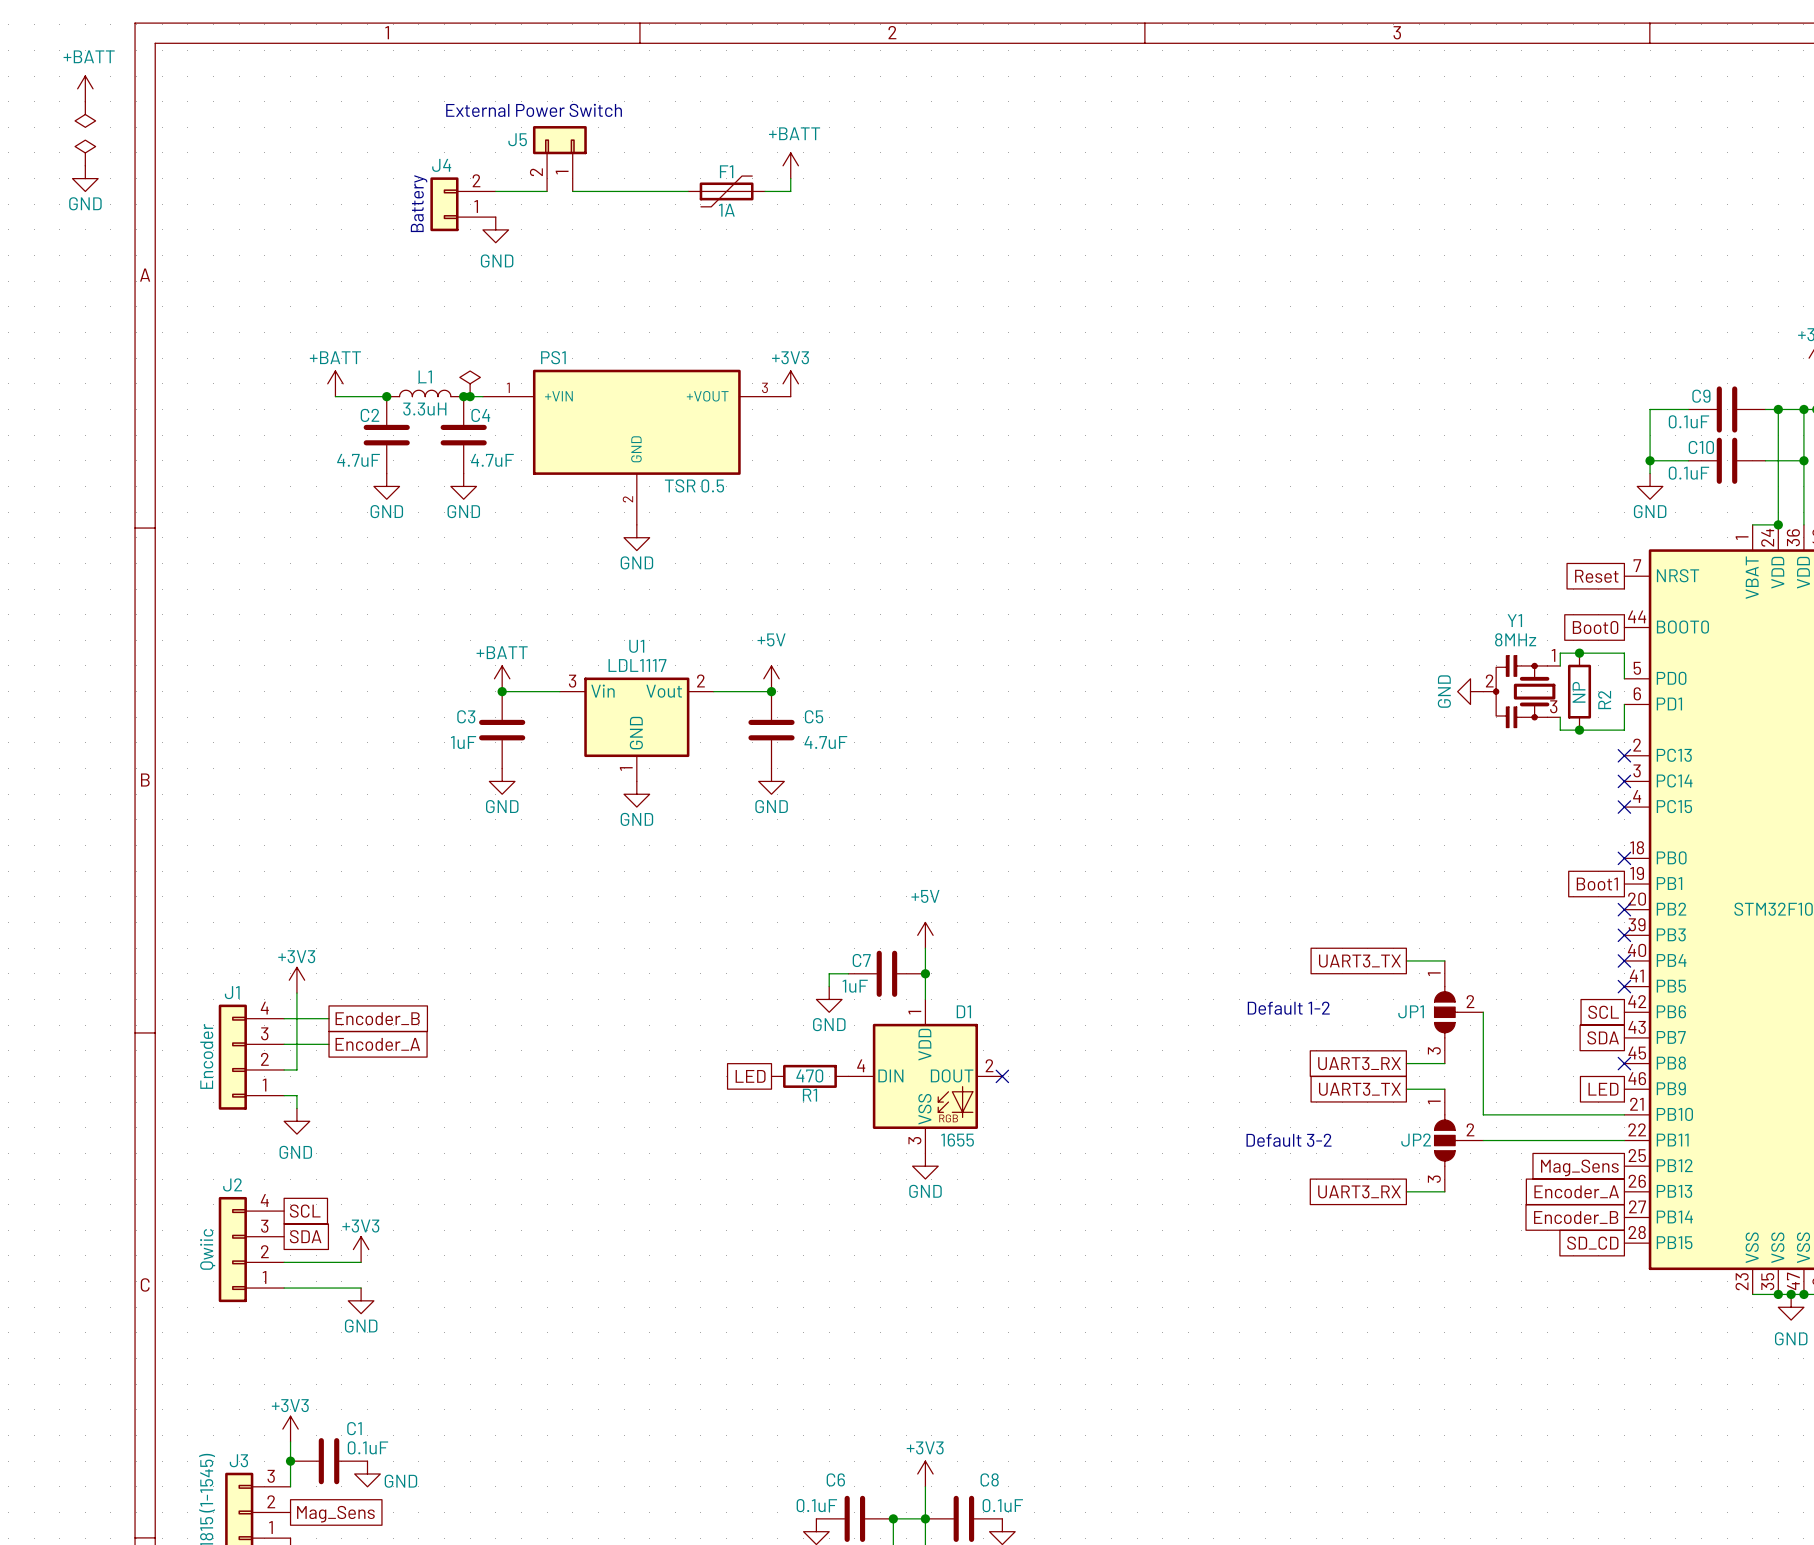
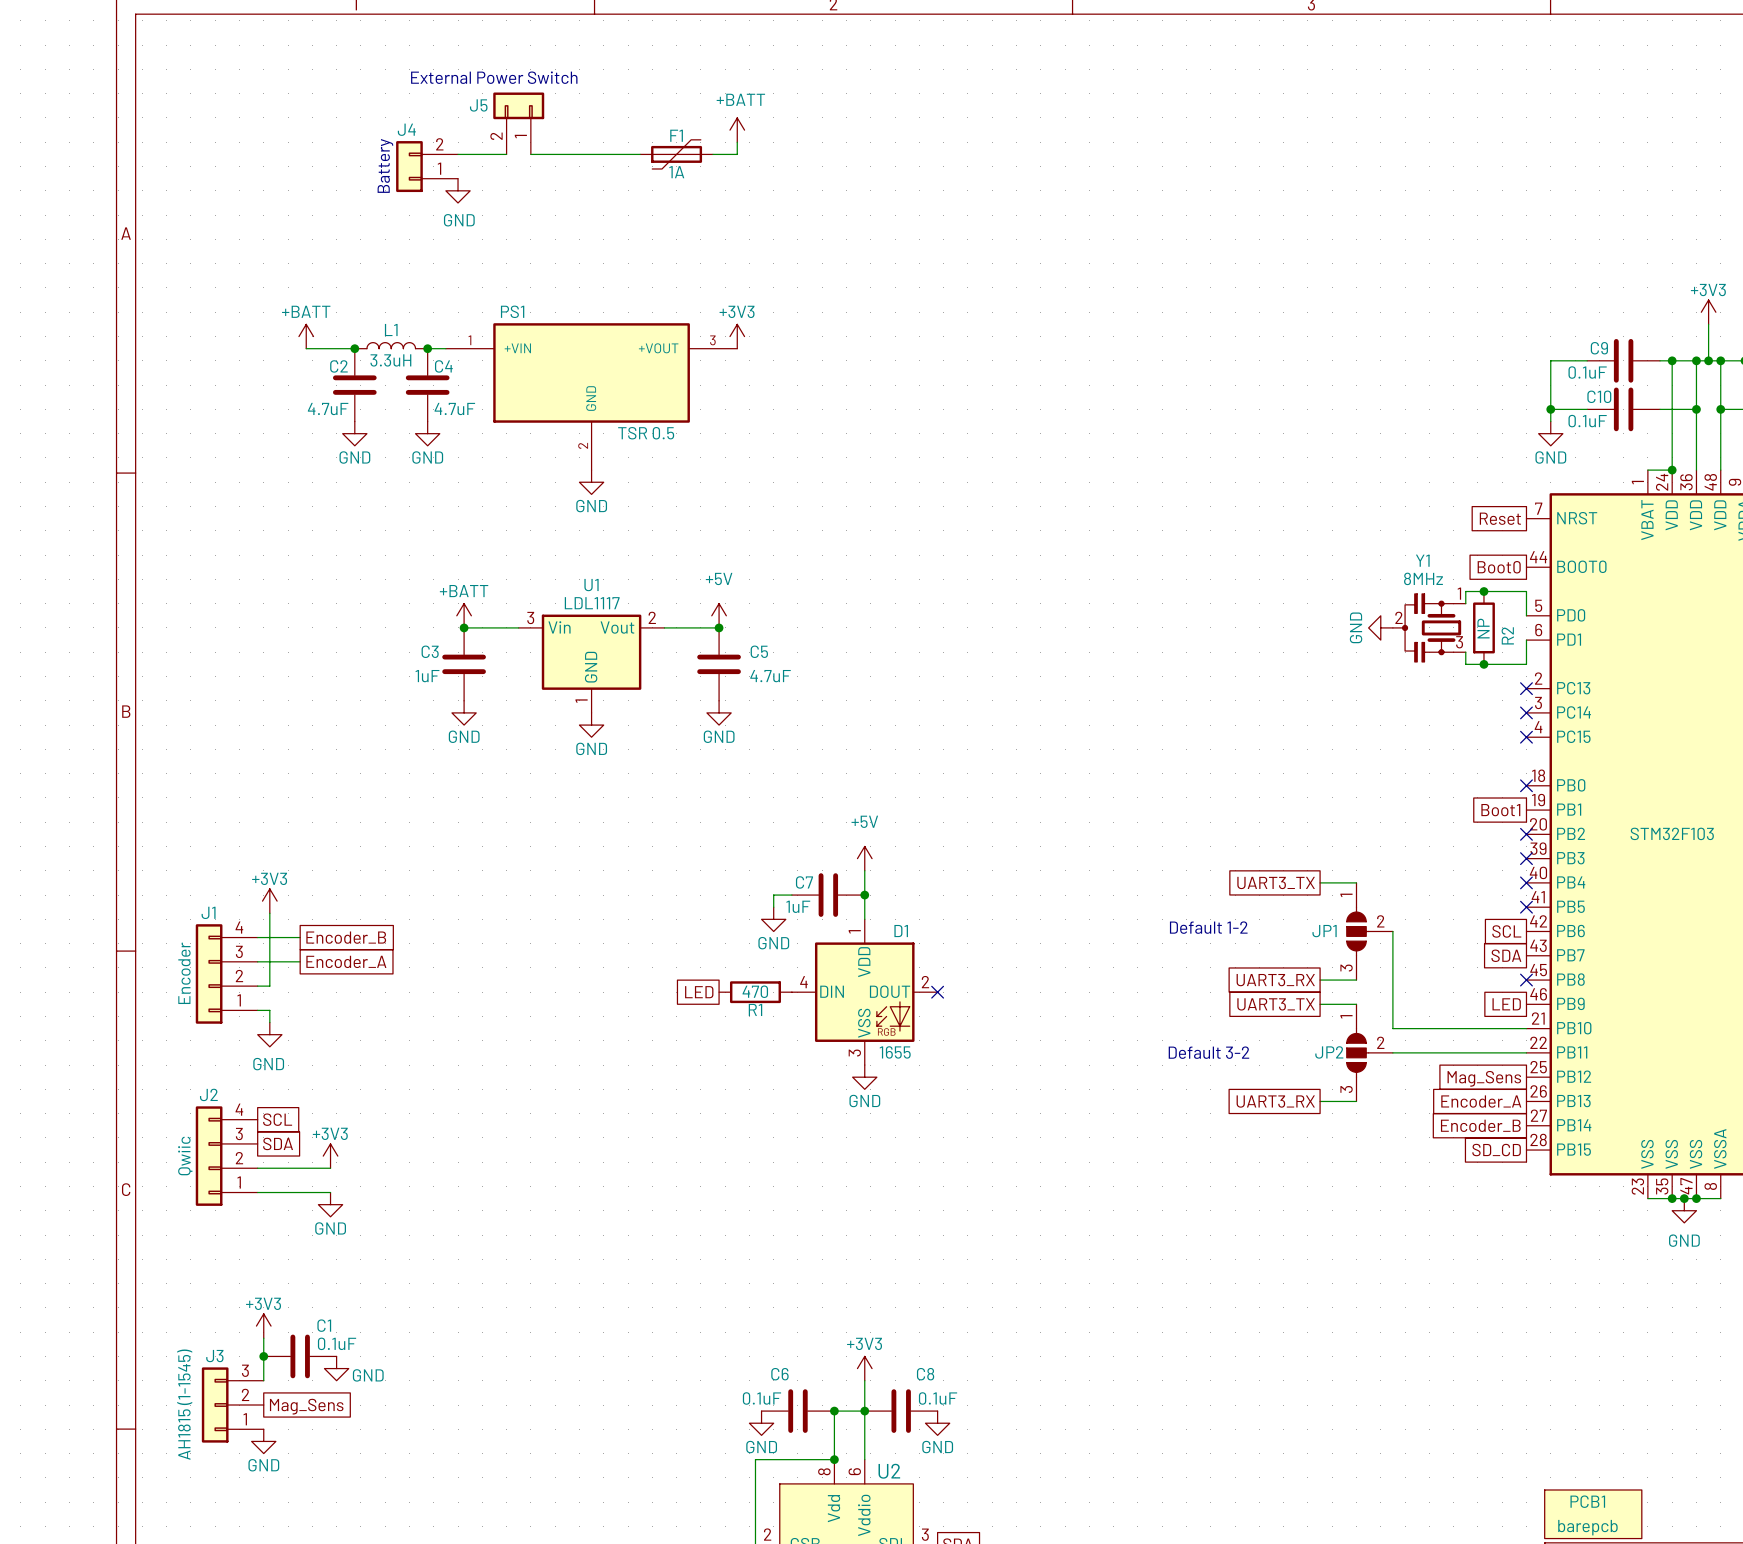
power symbol: +BATT (85, 88) -> none
power symbol: (85, 114) -> none
power symbol: (85, 152) -> none
power symbol: GND (85, 178) -> none
power symbol: (470, 383) -> none
junction: (470, 396) -> none

